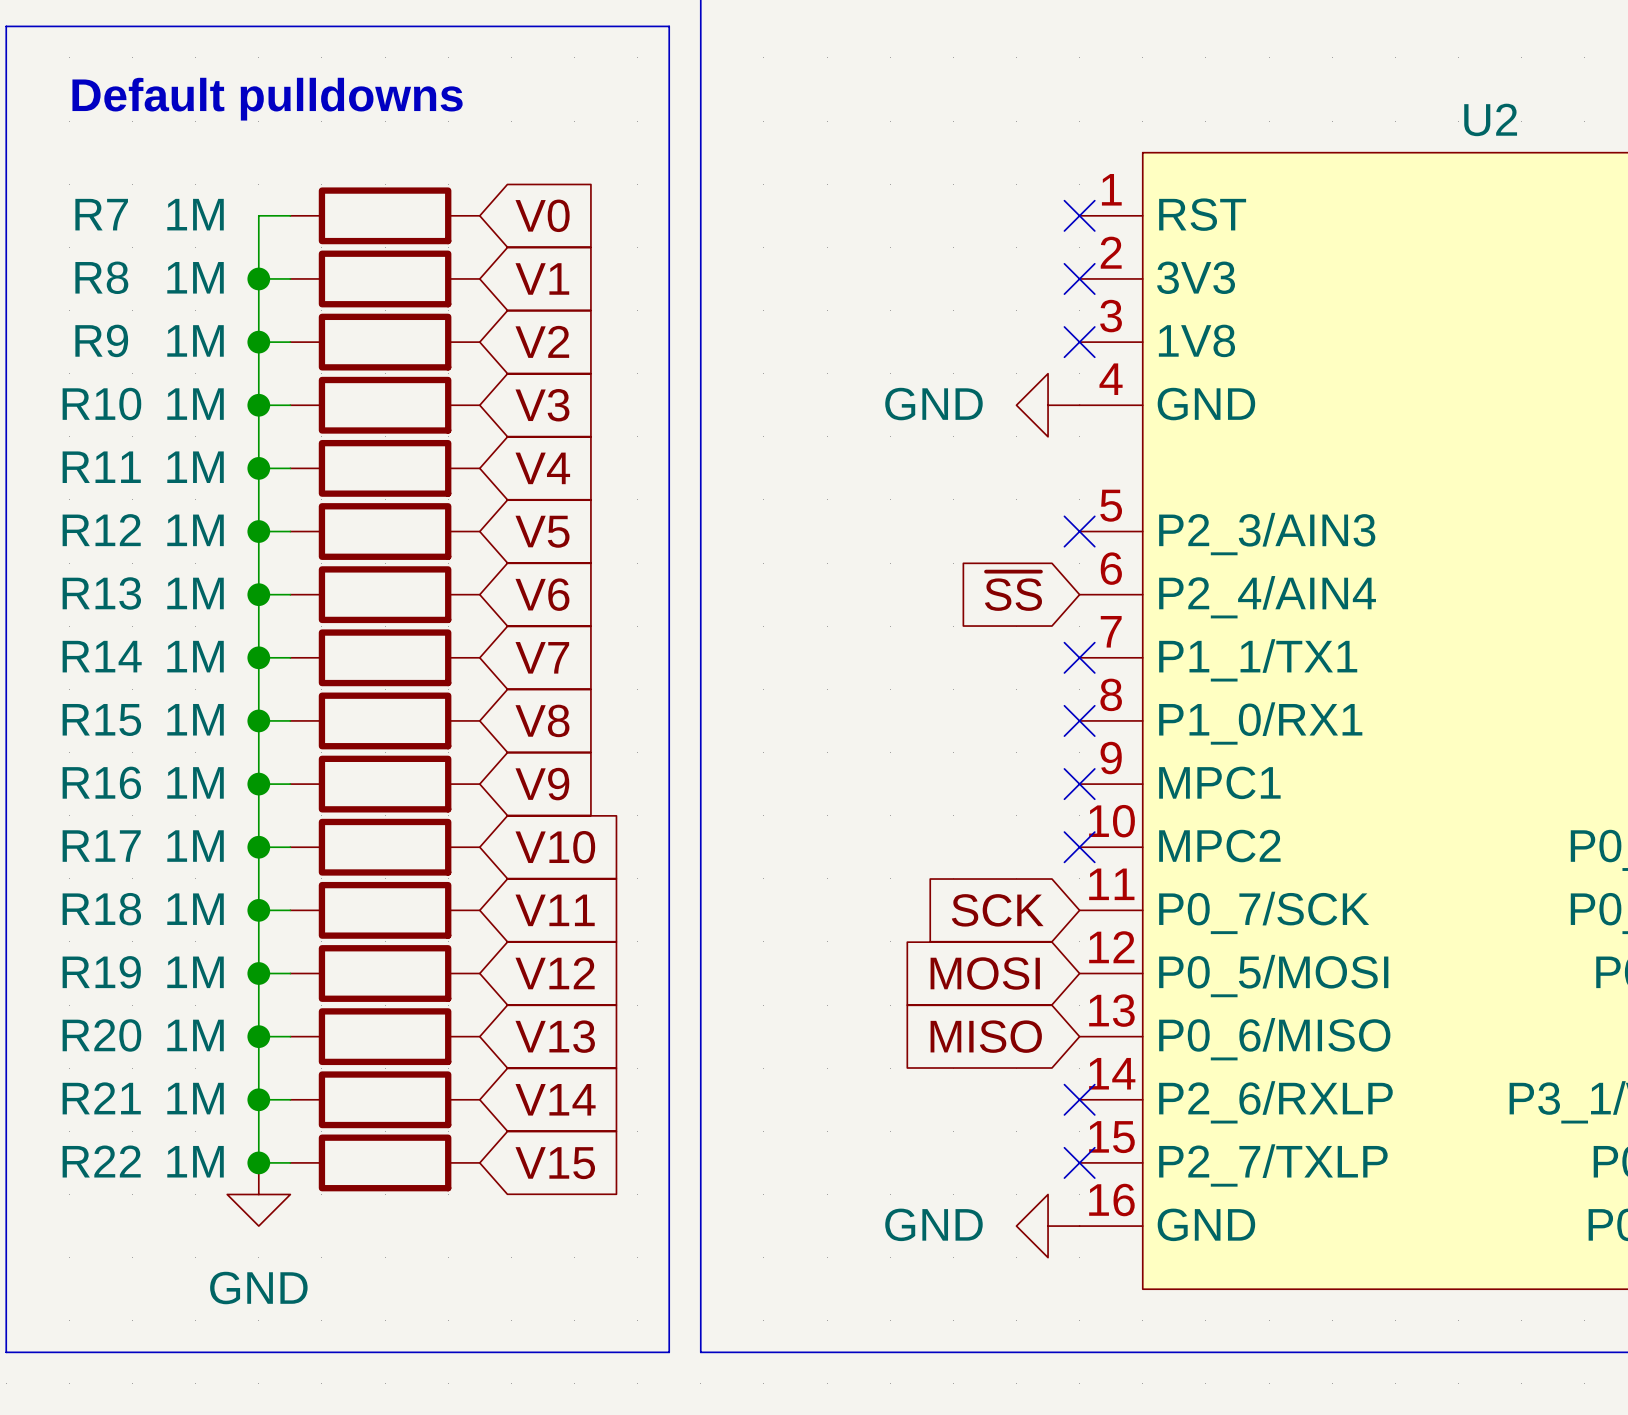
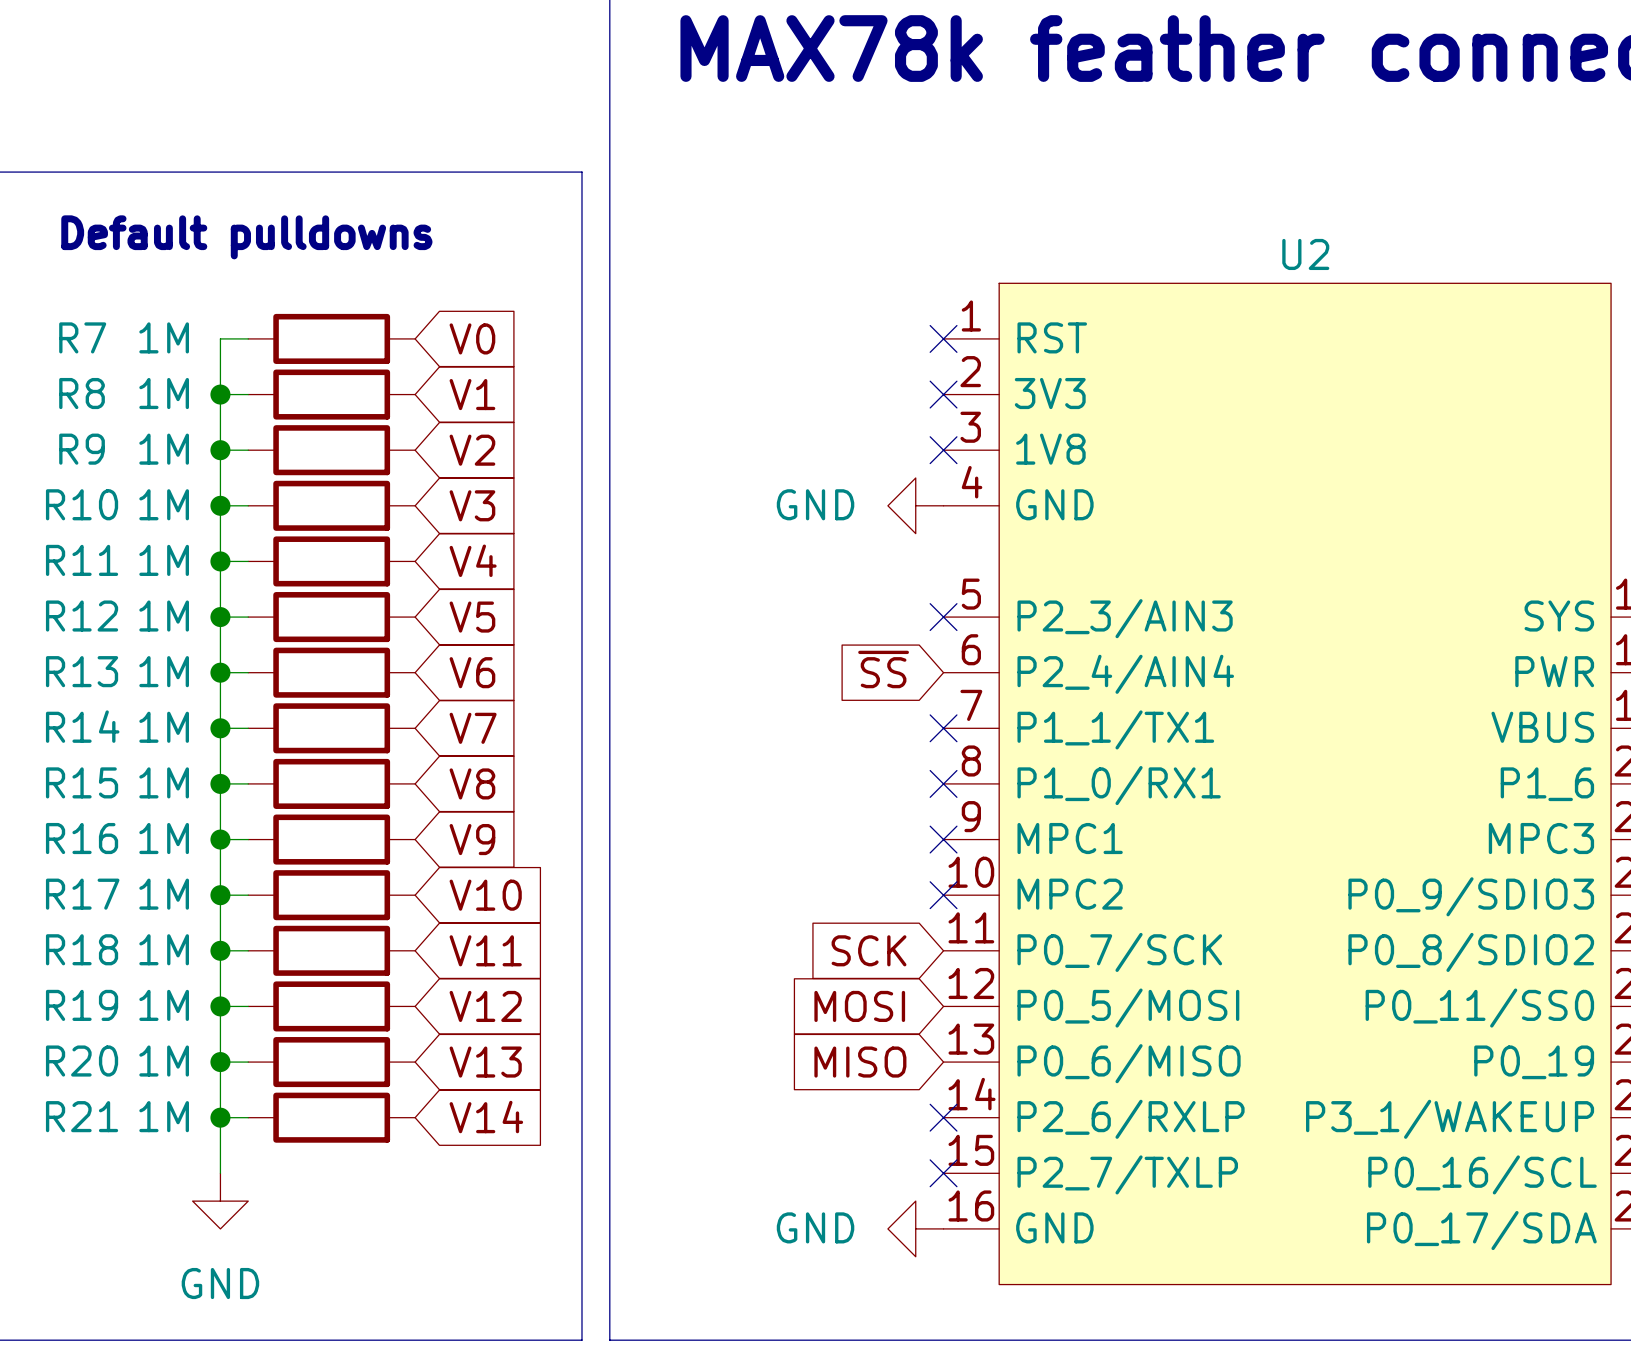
wire: (258, 1162) (290, 1162) -> none
junction: (258, 1162) -> none
R22: 1M (385, 1162) -> none
global label: V15 (555, 1163) -> none

